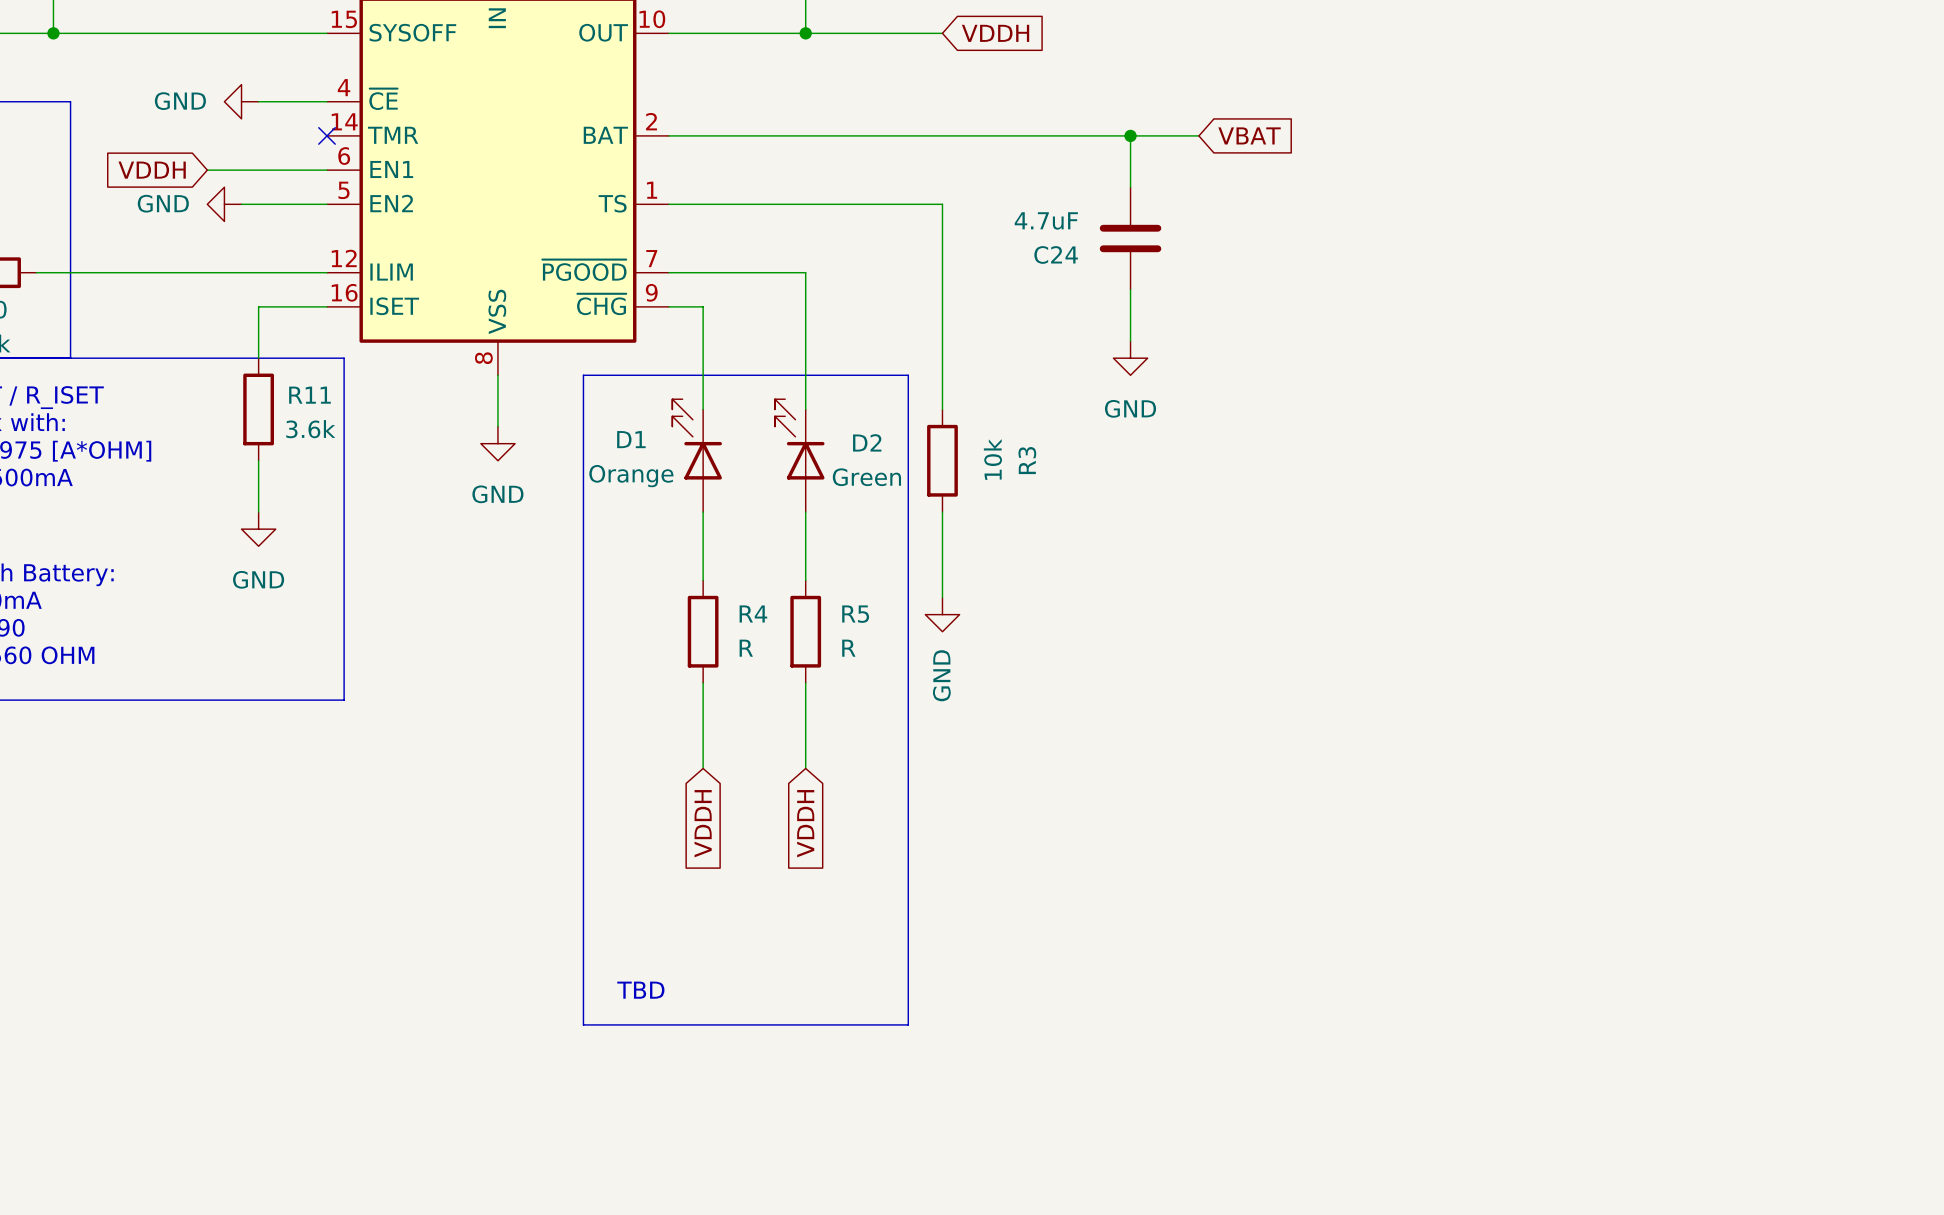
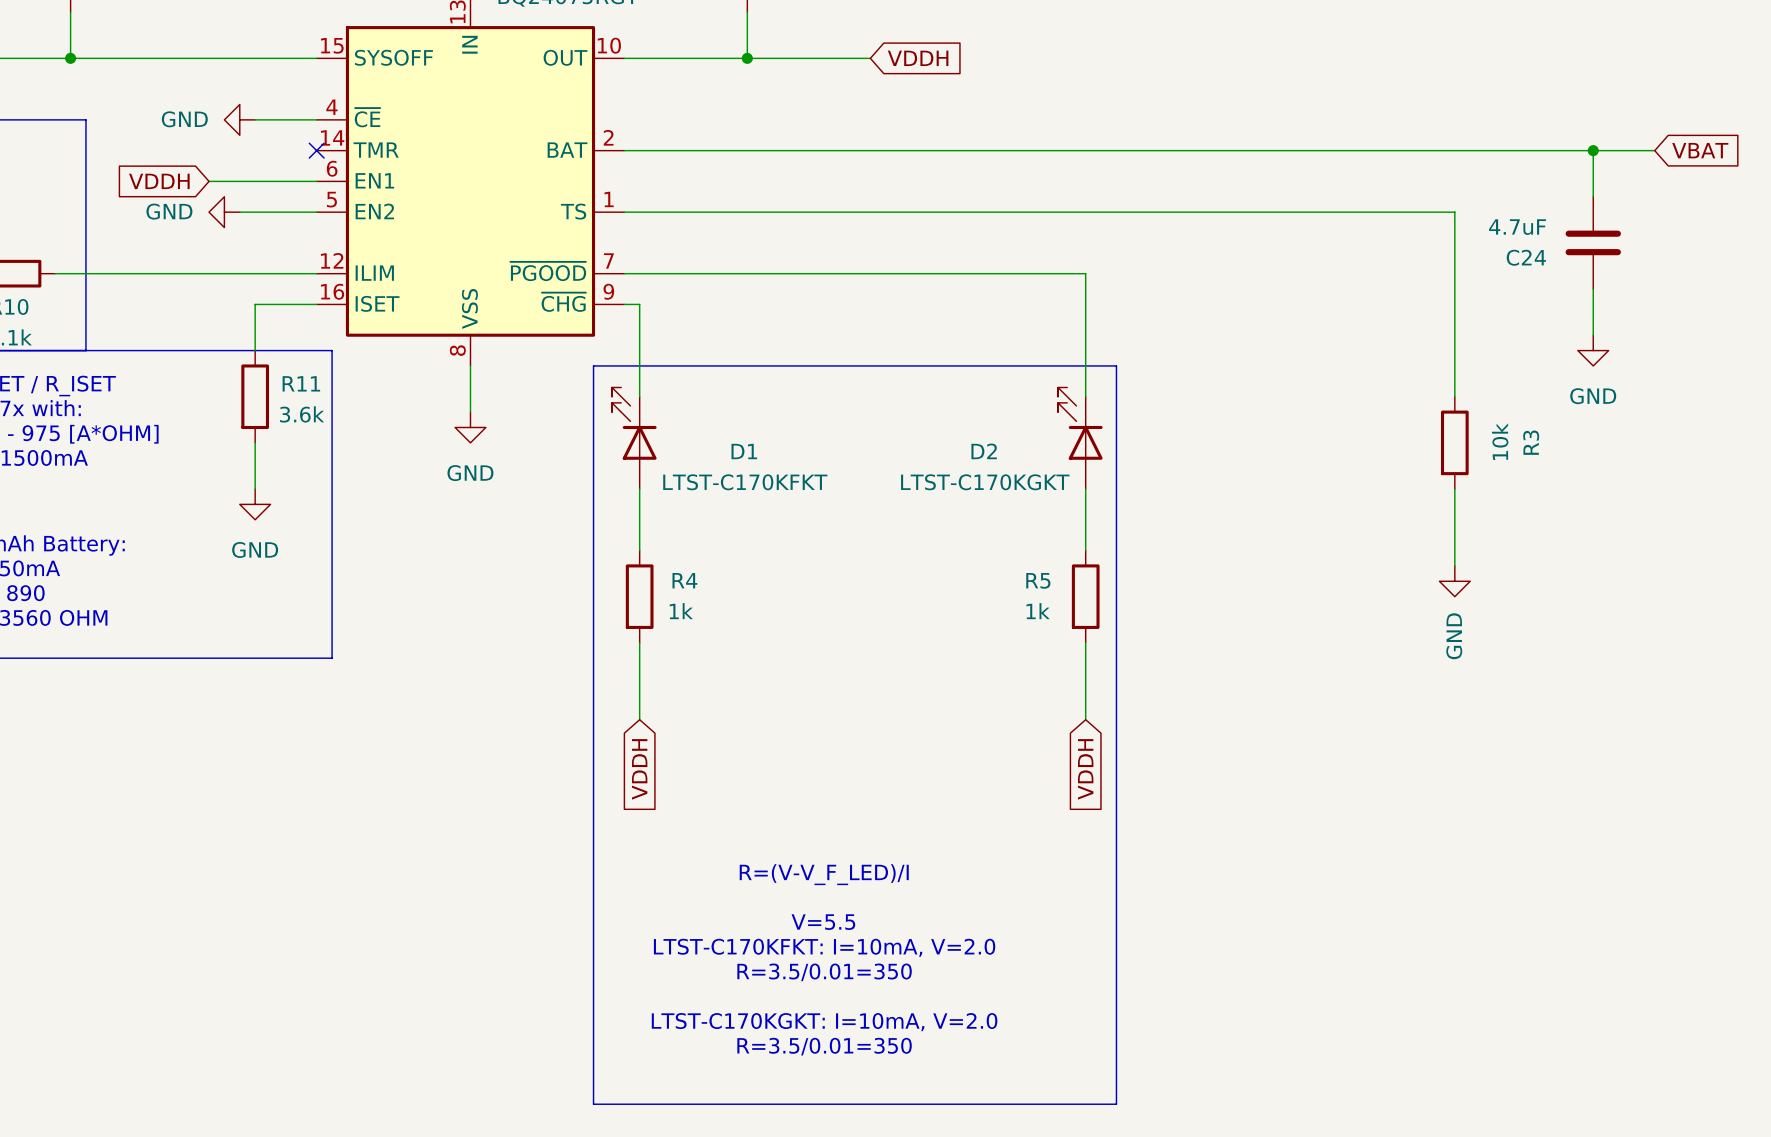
wire: (1130, 135) (1130, 187) -> none
junction: (1130, 135) -> none
wire: none -> (1101, 150) (1654, 150)
global label: VBAT (1249, 135) -> none
wire: none -> (1593, 150) (1593, 196)
junction: none -> (1593, 150)
global label: none -> VBAT (1700, 150)
wire: (942, 204) (942, 409) -> (870, 212) (1454, 212) (1454, 396)
C24 position: (1130, 238) -> (1593, 242)
wire: (805, 272) (805, 409) -> (747, 273) (1085, 273) (1085, 396)
wire: (1130, 289) (1130, 341) -> none
wire: none -> (1593, 289) (1593, 335)
wire: (686, 306) (703, 306) (703, 409) -> (639, 304) (639, 396)
power symbol: GND (1130, 358) -> none
power symbol: none -> GND (1593, 350)
line: (634, 375) (583, 375) (583, 1024) (908, 1024) (908, 375) -> (593, 365) (593, 1104) (1116, 1104) (1116, 365) (839, 365)
D1 name position: D1 (631, 439) -> D1 (744, 451)
D2 name position: D2 (867, 442) -> D2 (984, 451)
D1 position: (697, 455) -> (634, 438)
D2 position: (799, 455) -> (1080, 438)
R3 position: (942, 460) -> (1454, 442)
D1 value: Orange (631, 476) -> LTST-C170KFKT (745, 482)
D2 value: Green (866, 477) -> LTST-C170KGKT (985, 482)
wire: (703, 512) (703, 580) -> (639, 489) (639, 550)
wire: (805, 512) (805, 580) -> none
wire: (942, 512) (942, 597) -> (1085, 642) (1085, 719)
wire: none -> (1085, 489) (1085, 550)
wire: none -> (1454, 489) (1454, 565)
R5 name position: R5 (855, 614) -> R5 (1038, 580)
power symbol: GND (942, 614) -> none
power symbol: none -> GND (1454, 581)
R4 position: (703, 631) -> (639, 596)
R5 position: (805, 631) -> (1085, 596)
R4 value: R (746, 648) -> 1k (681, 611)
R5 value: R (848, 648) -> 1k (1038, 611)
wire: (703, 683) (703, 768) -> (639, 642) (639, 719)
wire: (805, 683) (805, 768) -> none
global label position: VDDH (703, 823) -> VDDH (639, 769)
global label: VDDH (805, 823) -> none
global label: none -> VDDH (1085, 769)
text: none -> R=(V-V_F_LED)/I (824, 874)
text: TBD (640, 990) -> none
text: none -> V=5.5 (823, 922)
text: none -> LTST-C170KFKT: I=10mA, V=2.0 (824, 947)
text: none -> R=3.5/0.01=350 (824, 972)
text: none -> LTST-C170KGKT: I=10mA, V=2.0 (824, 1022)
text: none -> R=3.5/0.01=350 (824, 1046)

